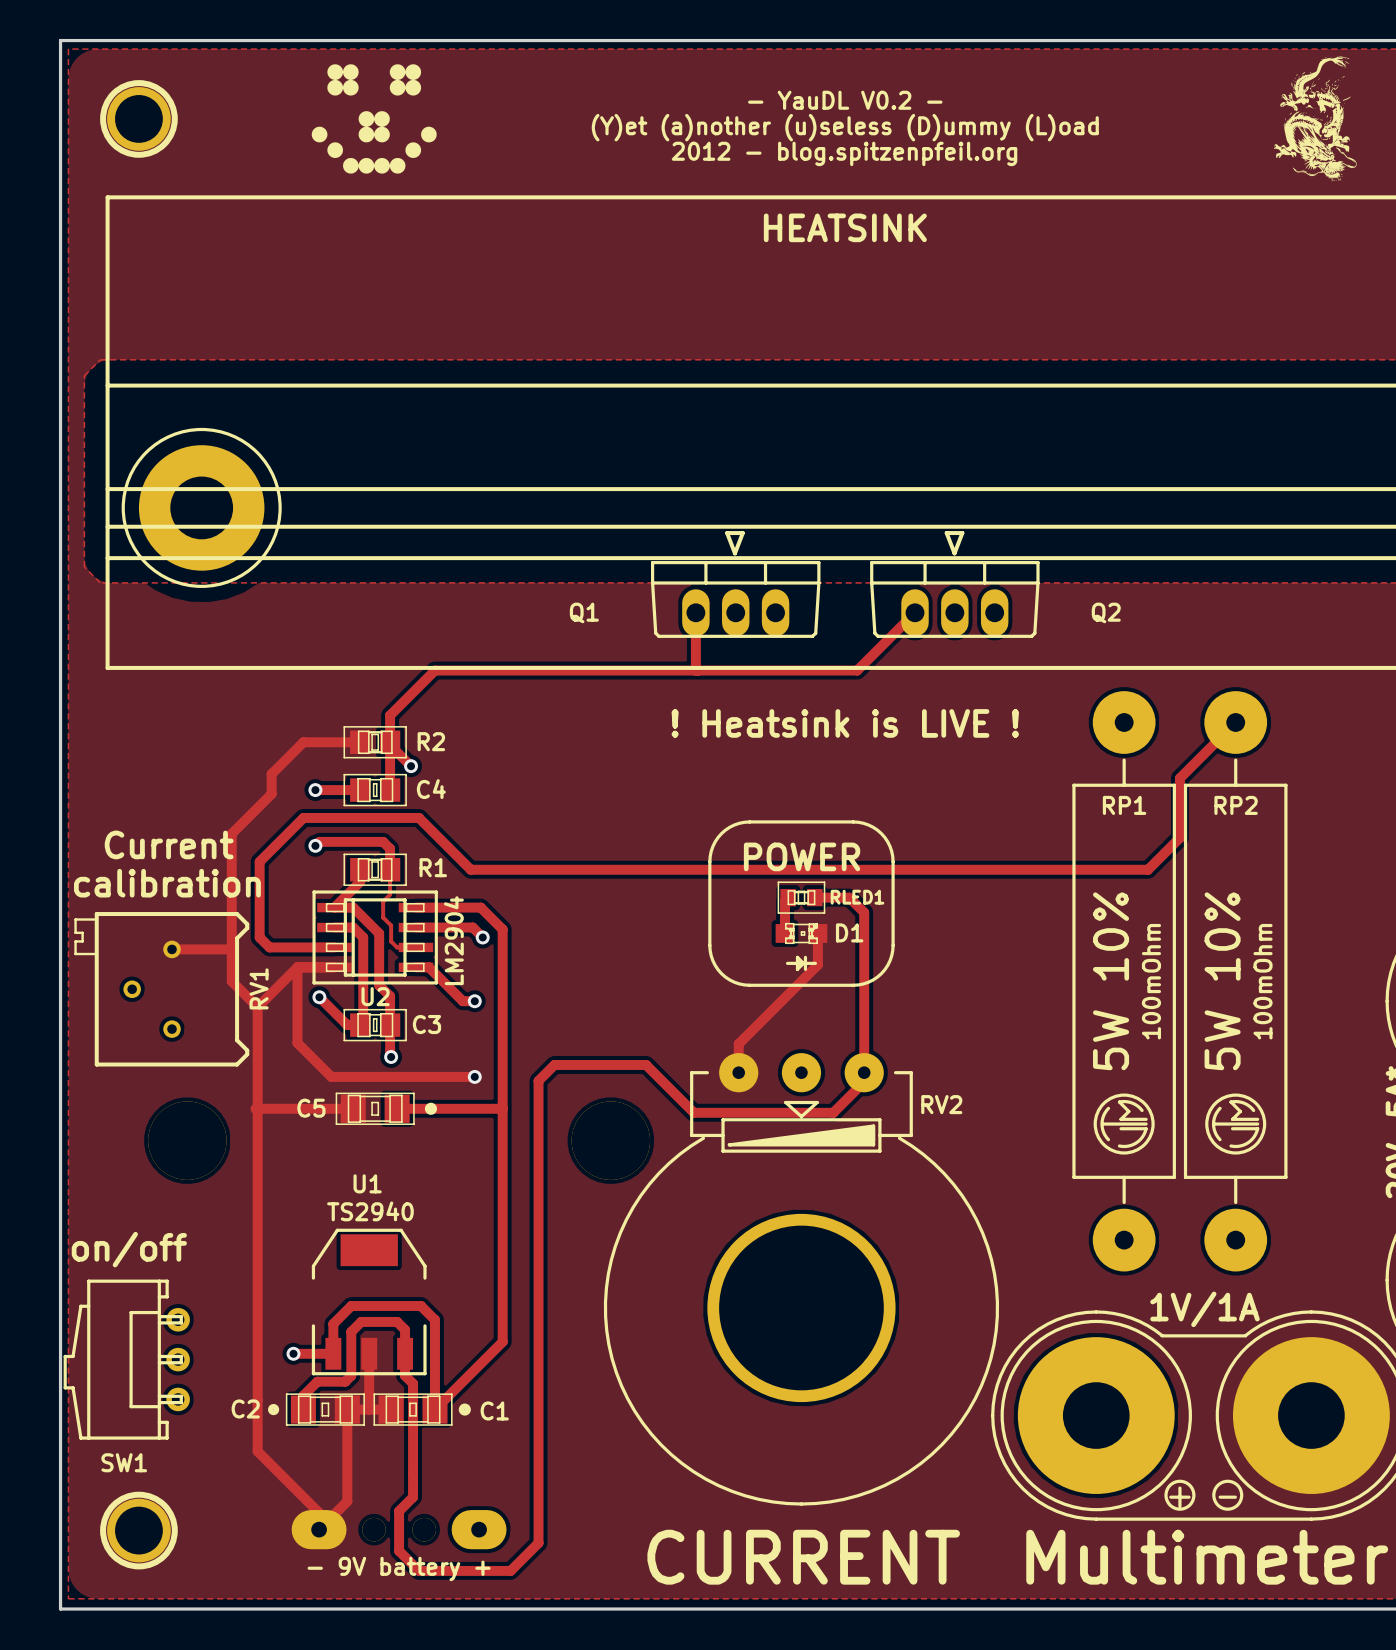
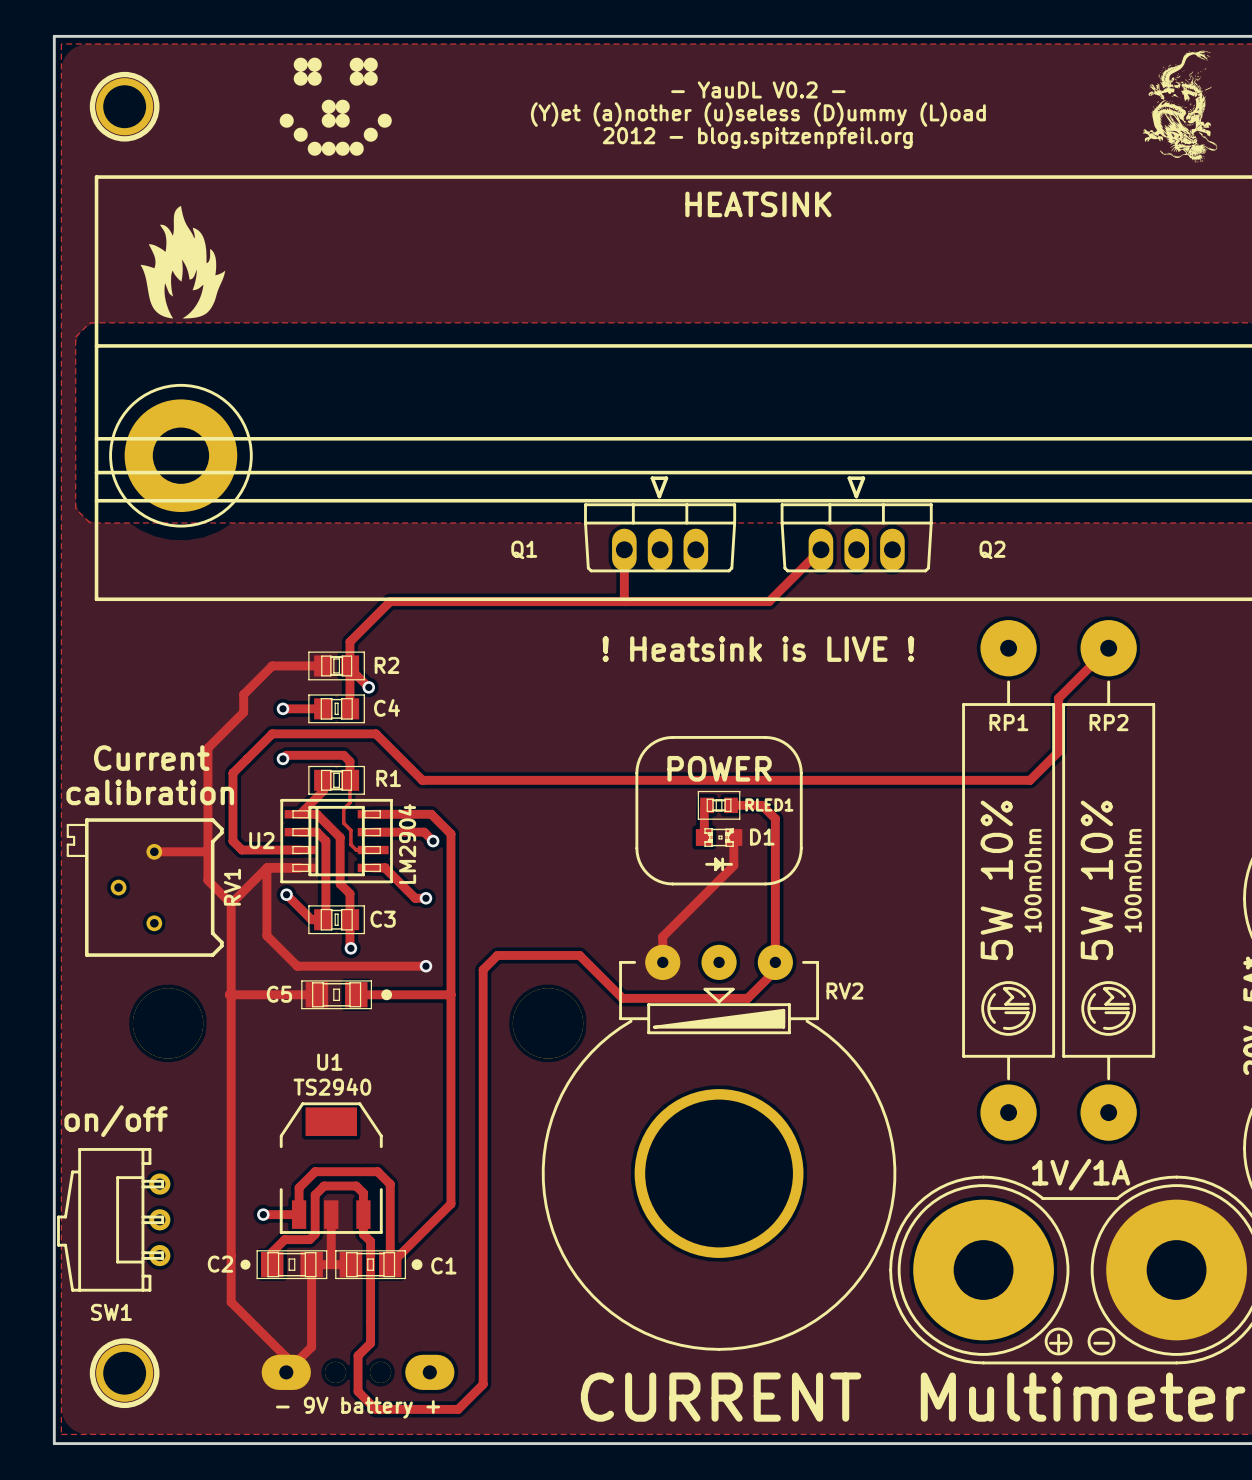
drawing: none -> [140, 205, 226, 319]
U2 name position: U2 (375, 996) -> U2 (261, 840)

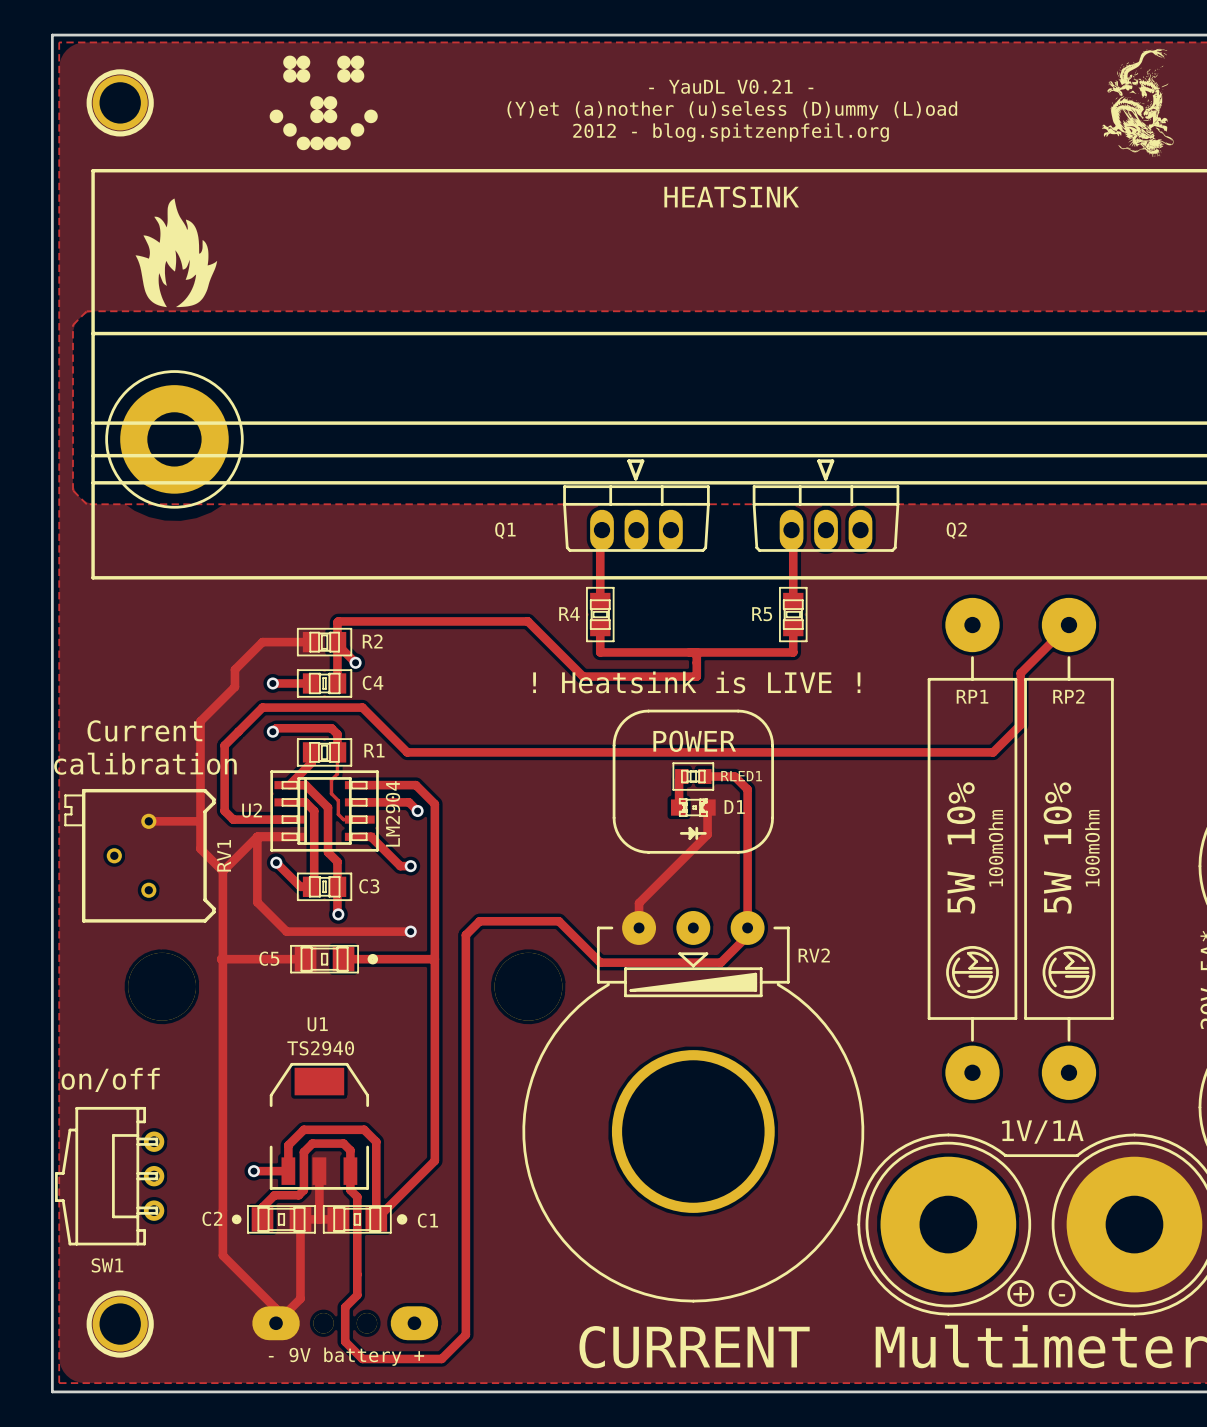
text: - YauDL V0.2 - (758, 89) -> - YauDL V0.21 - (731, 86)
track: (624, 549) (624, 601) -> (602, 530) (600, 531) (600, 601)
track: (820, 549) (769, 601) (390, 601) (349, 641) (349, 645) -> (696, 652) (696, 676) (583, 676) (527, 621) (337, 622)
track: none -> (791, 530) (793, 531) (793, 601)
R4: none -> (600, 614)
R5: none -> (793, 614)
text position: ! Heatsink is LIVE ! (758, 649) -> ! Heatsink is LIVE ! (696, 682)
track: none -> (600, 627) (600, 652) (793, 652) (793, 627)

